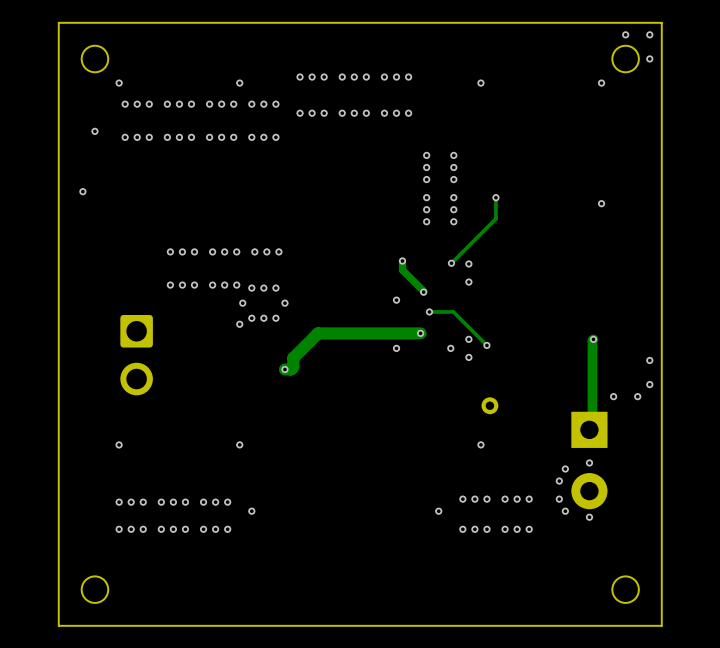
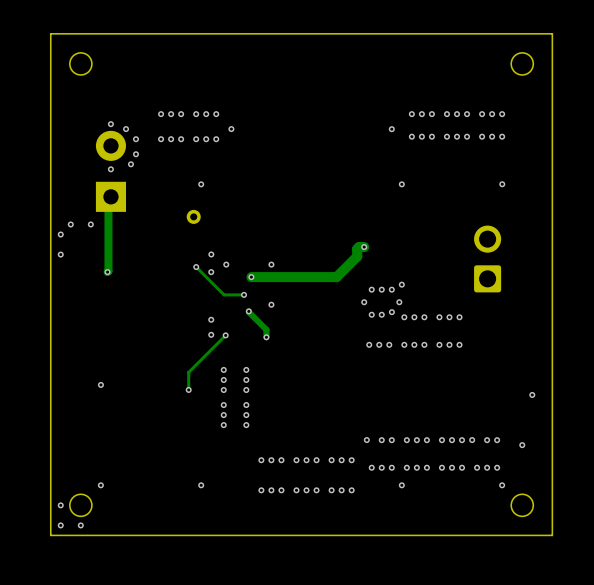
via: (625, 34) -> none
via: (649, 34) -> none
via: (649, 58) -> none
via: (300, 77) -> none
via: (312, 77) -> none
via: (324, 77) -> none
via: (342, 77) -> none
via: (354, 77) -> none
via: (366, 77) -> none
via: (384, 77) -> none
via: (396, 77) -> none
via: (408, 77) -> none
via: (119, 83) -> none
via: (239, 83) -> none
via: (480, 83) -> none
via: (601, 83) -> none
via: (125, 104) -> none
via: (137, 104) -> none
via: (149, 104) -> none
via: (167, 104) -> none
via: (179, 104) -> none
via: (191, 104) -> none
via: (209, 104) -> none
via: (221, 104) -> none
via: (233, 104) -> none
via: (251, 104) -> none
via: (263, 104) -> none
via: (275, 104) -> none
via: (300, 113) -> none
via: (312, 113) -> none
via: (324, 113) -> none
via: (342, 113) -> none
via: (354, 113) -> none
via: (366, 113) -> none
via: (384, 113) -> none
via: (396, 113) -> none
via: (408, 113) -> none
via: none -> (161, 114)
via: none -> (171, 114)
via: none -> (181, 114)
via: none -> (196, 114)
via: none -> (206, 114)
via: none -> (216, 114)
via: none -> (411, 114)
via: none -> (421, 114)
via: none -> (431, 114)
via: none -> (446, 114)
via: none -> (457, 114)
via: none -> (467, 114)
via: none -> (482, 114)
via: none -> (492, 114)
via: none -> (502, 114)
via: (94, 131) -> none
via: none -> (110, 124)
via: (125, 137) -> none
via: (137, 137) -> none
via: (167, 137) -> none
via: (179, 137) -> none
via: (191, 137) -> none
via: (209, 137) -> none
via: (221, 137) -> none
via: (233, 137) -> none
via: (251, 137) -> none
via: (263, 137) -> none
via: none -> (391, 129)
via: none -> (411, 136)
via: none -> (421, 136)
via: none -> (431, 136)
via: none -> (446, 136)
via: none -> (457, 136)
via: none -> (467, 136)
via: none -> (482, 136)
via: none -> (492, 136)
via: none -> (502, 136)
via: none -> (135, 139)
via: none -> (161, 139)
via: none -> (171, 139)
via: none -> (181, 139)
via: none -> (196, 139)
via: none -> (206, 139)
via: none -> (216, 139)
via: (426, 155) -> none
via: (453, 155) -> none
via: none -> (135, 154)
via: (426, 167) -> none
via: (453, 167) -> none
via: none -> (130, 164)
via: (426, 179) -> none
via: (453, 179) -> none
via: none -> (110, 169)
part: none -> (110, 171)
via: (82, 191) -> none
via: (426, 197) -> none
via: (453, 197) -> none
track: (495, 197) (495, 218) (451, 263) -> none
via: (495, 197) -> none
via: none -> (201, 184)
via: none -> (401, 184)
via: (426, 209) -> none
via: (453, 209) -> none
track: none -> (110, 196) (108, 199) (107, 272)
via: (426, 221) -> none
via: (453, 221) -> none
part: none -> (193, 216)
via: (170, 251) -> none
via: (182, 251) -> none
via: (194, 251) -> none
via: (212, 251) -> none
via: (224, 251) -> none
via: (236, 251) -> none
via: (254, 251) -> none
via: (266, 251) -> none
via: (278, 251) -> none
via: none -> (70, 224)
via: none -> (90, 224)
track: (402, 261) (402, 270) (423, 292) -> none
via: (402, 261) -> none
via: (451, 263) -> none
via: (468, 263) -> none
via: none -> (60, 234)
track: none -> (364, 247) (357, 249) (357, 256) (336, 277) (251, 277)
via: none -> (364, 247)
via: (468, 282) -> none
via: (170, 285) -> none
via: (182, 285) -> none
via: (194, 285) -> none
via: (212, 285) -> none
via: (224, 285) -> none
via: (236, 285) -> none
via: none -> (60, 254)
via: (263, 288) -> none
via: (275, 288) -> none
via: (423, 292) -> none
part: none -> (487, 258)
via: none -> (226, 264)
via: none -> (271, 264)
via: (396, 300) -> none
track: none -> (196, 267) (224, 294) (244, 294)
via: none -> (196, 267)
via: (242, 303) -> none
via: (284, 303) -> none
via: none -> (107, 272)
via: none -> (211, 272)
track: (429, 311) (453, 311) (486, 345) -> none
via: (429, 311) -> none
via: none -> (251, 277)
via: (251, 318) -> none
via: (263, 318) -> none
via: (275, 318) -> none
via: (239, 324) -> none
via: none -> (401, 284)
via: none -> (371, 289)
via: none -> (381, 289)
via: none -> (391, 289)
track: (420, 333) (318, 333) (293, 358) (293, 367) (290, 369) (284, 369) -> none
via: (420, 333) -> none
via: none -> (244, 294)
via: (468, 339) -> none
track: (593, 339) (592, 426) (589, 429) -> none
via: (593, 339) -> none
via: none -> (364, 302)
via: none -> (399, 302)
via: (486, 345) -> none
via: none -> (271, 304)
via: (396, 348) -> none
via: (450, 348) -> none
part: (136, 355) -> none
track: none -> (248, 311) (266, 329) (266, 337)
via: none -> (248, 311)
via: none -> (371, 314)
via: none -> (381, 314)
via: (649, 360) -> none
via: none -> (404, 317)
via: none -> (414, 317)
via: none -> (424, 317)
via: none -> (439, 317)
via: none -> (449, 317)
via: none -> (459, 317)
via: none -> (211, 319)
via: (284, 369) -> none
via: none -> (211, 334)
via: (649, 384) -> none
track: none -> (225, 335) (188, 372) (188, 389)
via: none -> (225, 335)
via: none -> (266, 337)
via: none -> (369, 344)
via: none -> (379, 344)
via: none -> (389, 344)
via: none -> (404, 344)
via: none -> (414, 344)
via: none -> (424, 344)
via: none -> (439, 344)
via: none -> (449, 344)
via: none -> (459, 344)
via: (613, 396) -> none
via: (637, 396) -> none
part: (489, 405) -> none
via: none -> (223, 369)
via: none -> (246, 369)
via: none -> (223, 379)
via: none -> (246, 379)
via: (239, 444) -> none
via: (480, 444) -> none
via: none -> (188, 389)
via: none -> (223, 390)
via: none -> (246, 390)
via: none -> (532, 394)
part: (589, 460) -> none
via: (589, 462) -> none
via: none -> (223, 405)
via: none -> (246, 405)
via: (565, 469) -> none
via: none -> (223, 415)
via: none -> (246, 415)
via: (559, 481) -> none
via: none -> (223, 425)
via: none -> (246, 425)
via: (462, 499) -> none
via: (474, 499) -> none
via: (486, 499) -> none
via: (505, 499) -> none
via: (517, 499) -> none
via: (529, 499) -> none
via: (559, 499) -> none
via: (119, 502) -> none
via: (131, 502) -> none
via: (143, 502) -> none
via: (161, 502) -> none
via: (173, 502) -> none
via: (185, 502) -> none
via: (203, 502) -> none
via: (215, 502) -> none
via: (227, 502) -> none
via: (251, 511) -> none
via: none -> (381, 440)
via: none -> (391, 440)
via: none -> (406, 440)
via: none -> (416, 440)
via: none -> (426, 440)
via: none -> (441, 440)
via: none -> (451, 440)
via: none -> (462, 440)
via: none -> (487, 440)
via: none -> (497, 440)
via: (589, 517) -> none
via: none -> (522, 445)
via: (119, 529) -> none
via: (131, 529) -> none
via: (143, 529) -> none
via: (161, 529) -> none
via: (173, 529) -> none
via: (185, 529) -> none
via: (203, 529) -> none
via: (215, 529) -> none
via: (227, 529) -> none
via: (462, 529) -> none
via: (474, 529) -> none
via: (486, 529) -> none
via: (505, 529) -> none
via: (517, 529) -> none
via: (529, 529) -> none
via: none -> (261, 460)
via: none -> (271, 460)
via: none -> (281, 460)
via: none -> (296, 460)
via: none -> (306, 460)
via: none -> (316, 460)
via: none -> (331, 460)
via: none -> (341, 460)
via: none -> (351, 460)
via: none -> (371, 467)
via: none -> (381, 467)
via: none -> (391, 467)
via: none -> (406, 467)
via: none -> (416, 467)
via: none -> (426, 467)
via: none -> (441, 467)
via: none -> (451, 467)
via: none -> (462, 467)
via: none -> (477, 467)
via: none -> (487, 467)
via: none -> (497, 467)
via: none -> (100, 485)
via: none -> (201, 485)
via: none -> (401, 485)
via: none -> (502, 485)
via: none -> (261, 490)
via: none -> (271, 490)
via: none -> (281, 490)
via: none -> (296, 490)
via: none -> (306, 490)
via: none -> (316, 490)
via: none -> (331, 490)
via: none -> (341, 490)
via: none -> (351, 490)
via: none -> (60, 505)
via: none -> (60, 525)
via: none -> (80, 525)

